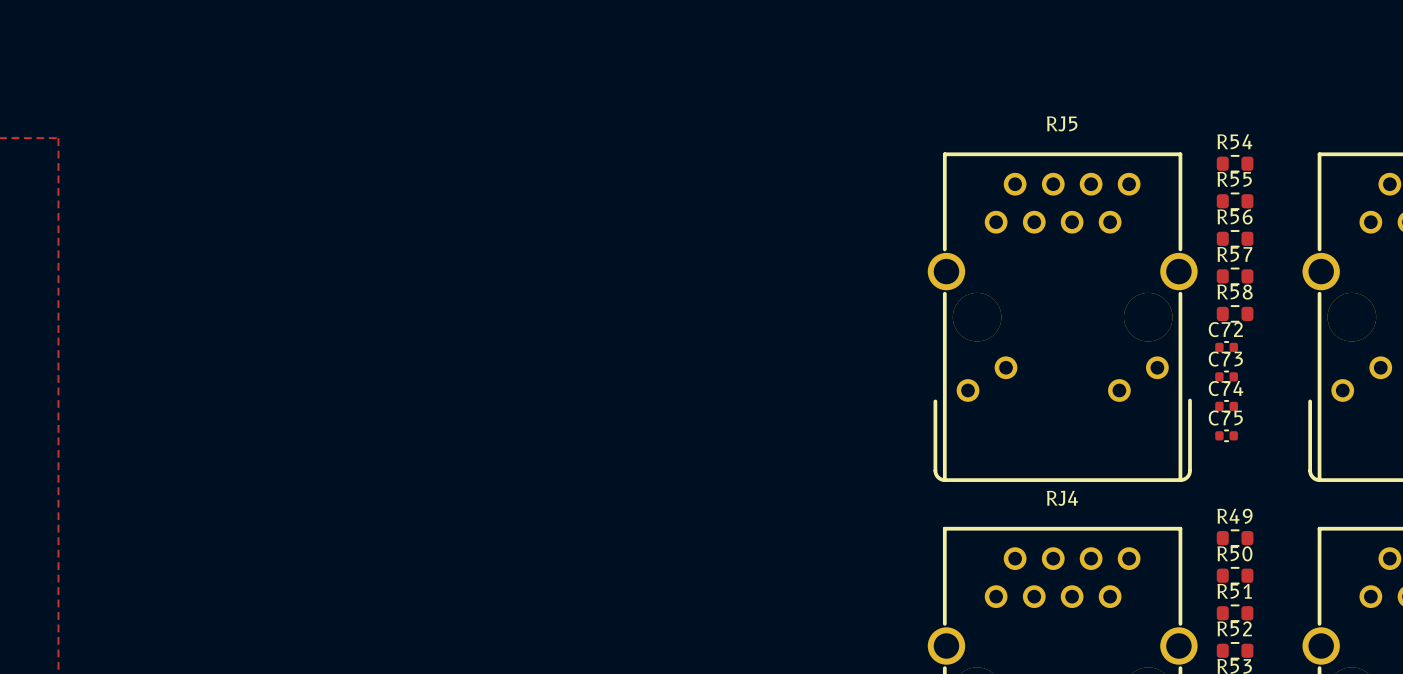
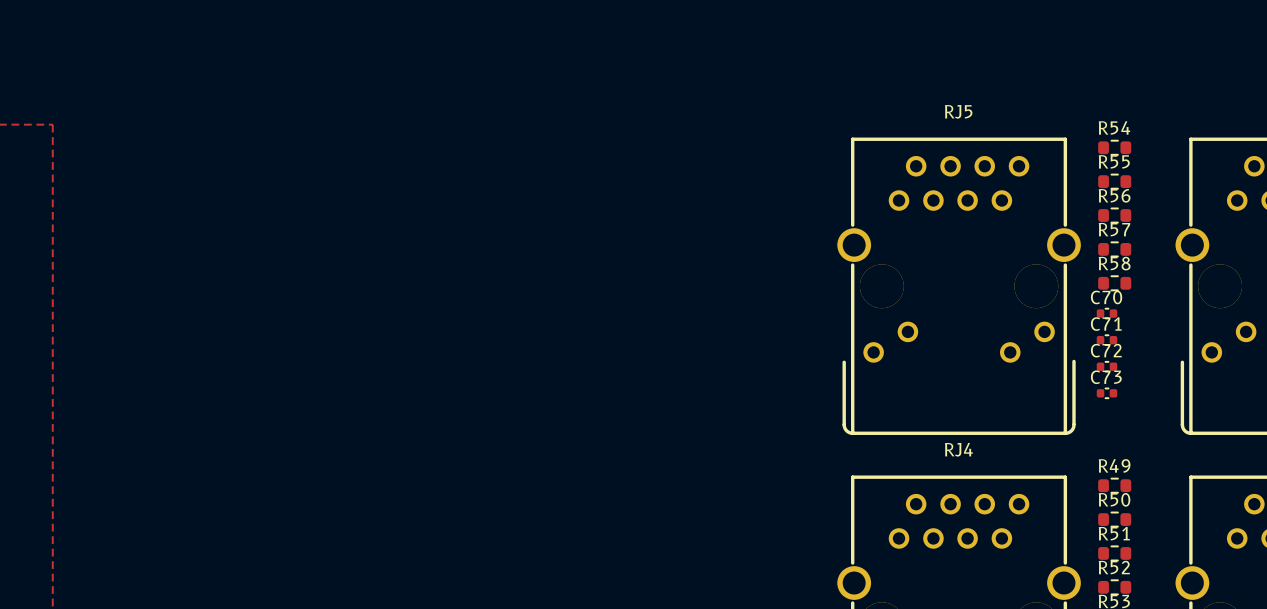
C72 name: C72 (1225, 329) -> C70 (1106, 297)
C73 name: C73 (1225, 359) -> C71 (1106, 324)
C74 name: C74 (1226, 388) -> C72 (1106, 350)
C75 name: C75 (1225, 418) -> C73 (1106, 377)

